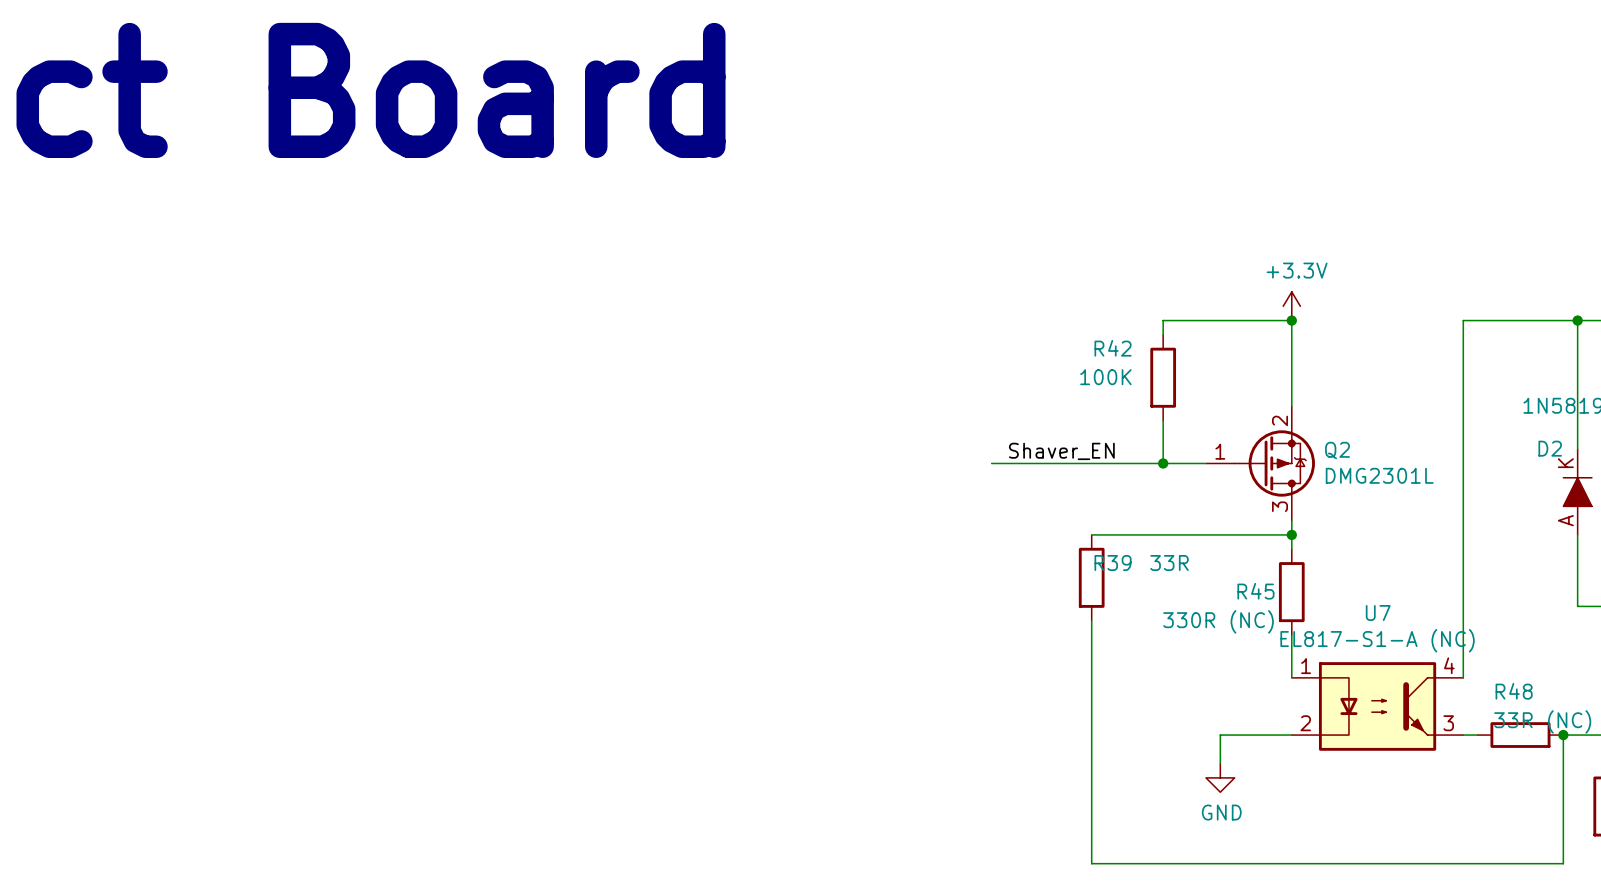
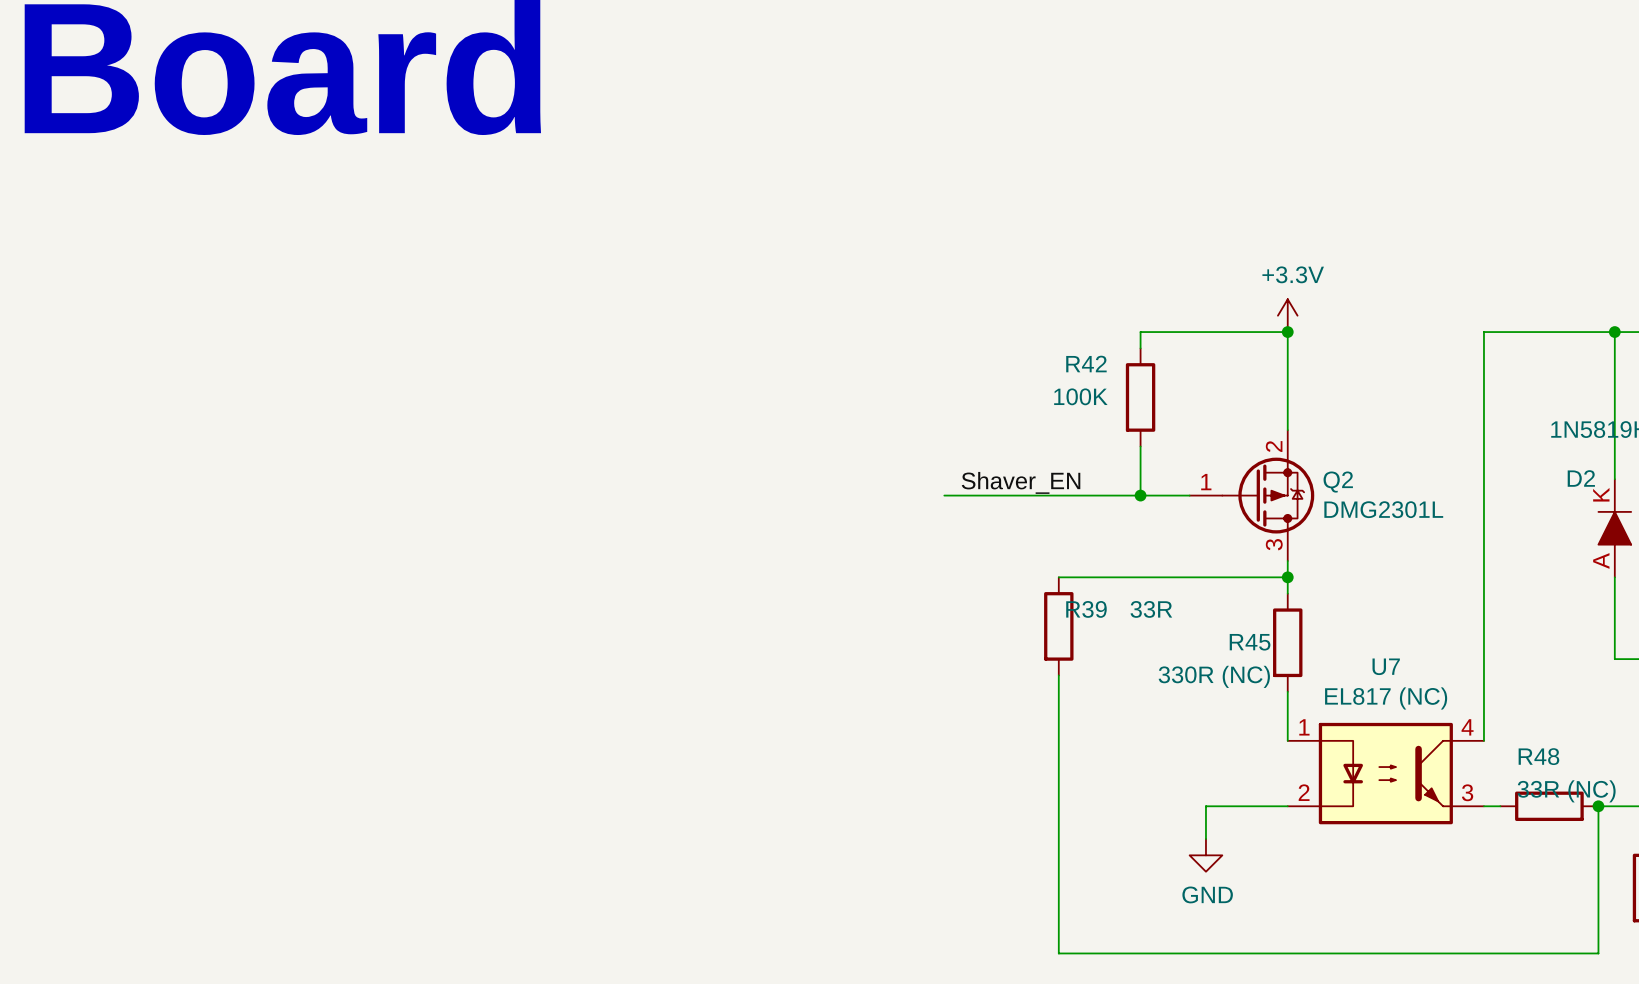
U7 value: EL817-S1-A (NC) (1377, 640) -> EL817 (NC) (1386, 698)

